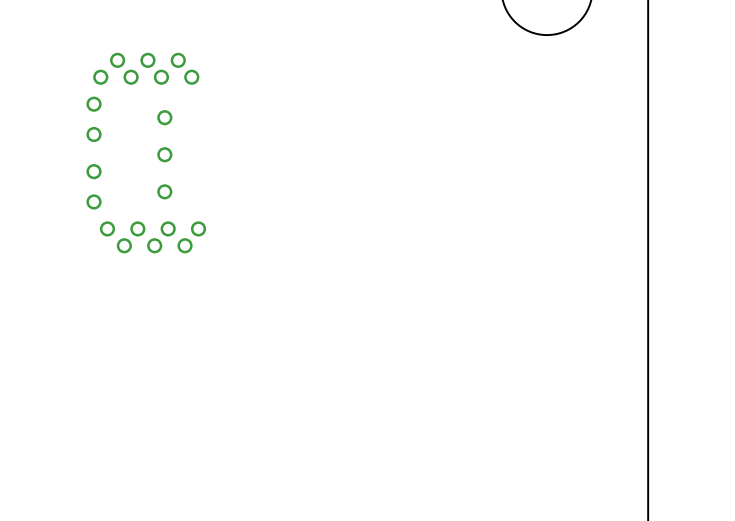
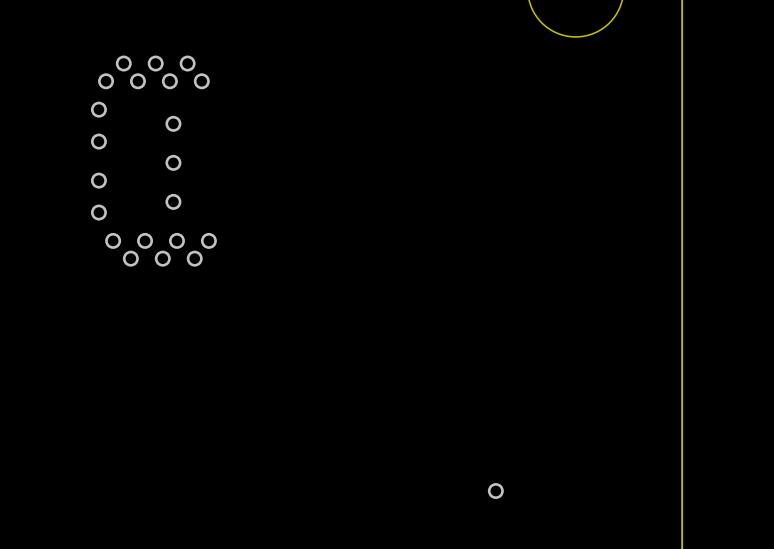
via: none -> (495, 491)

